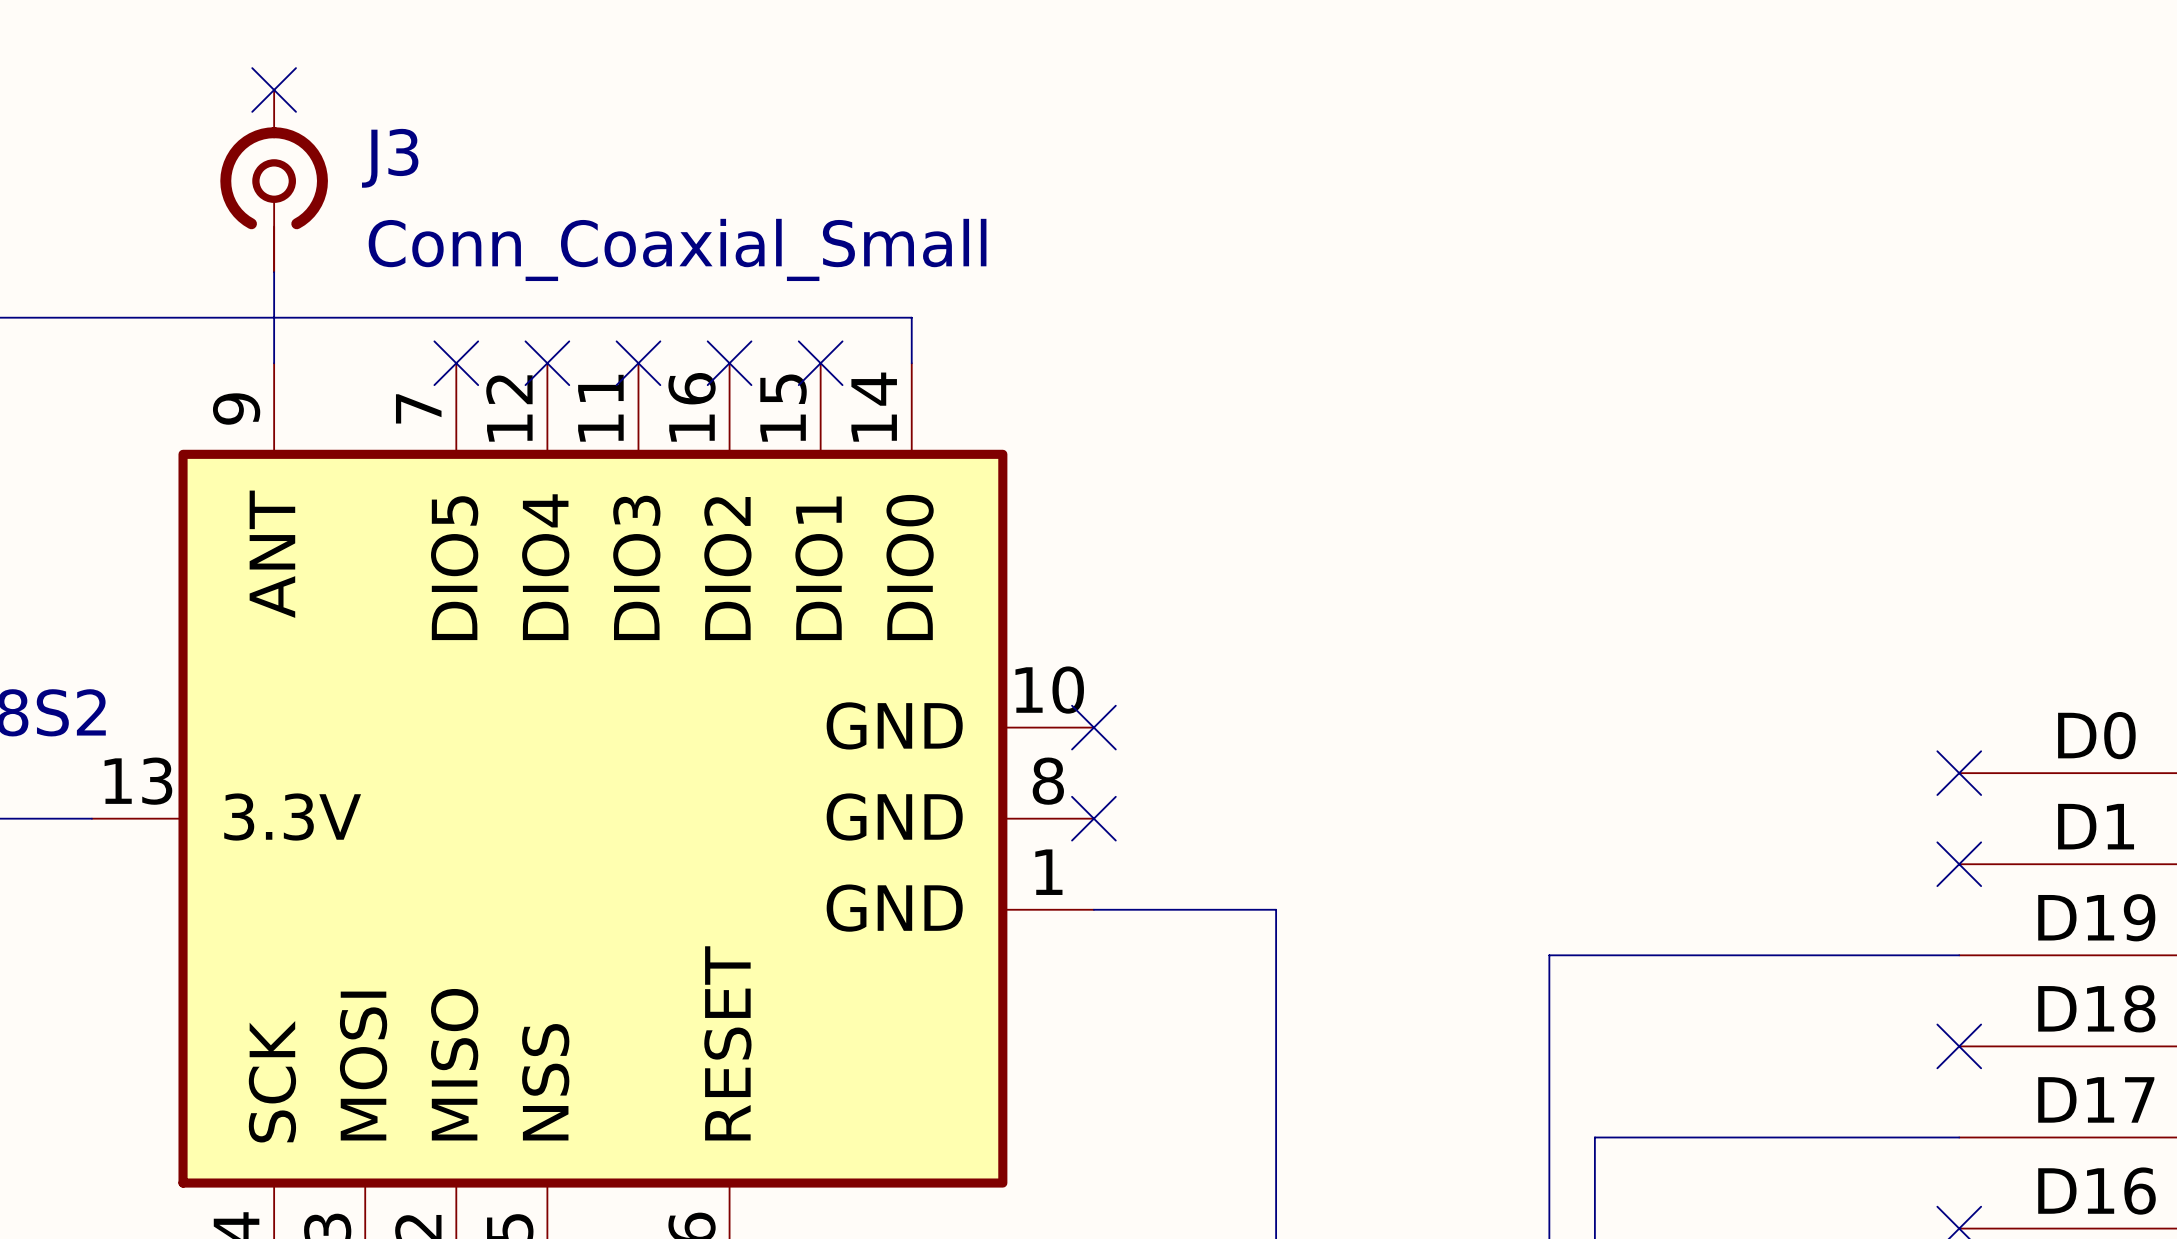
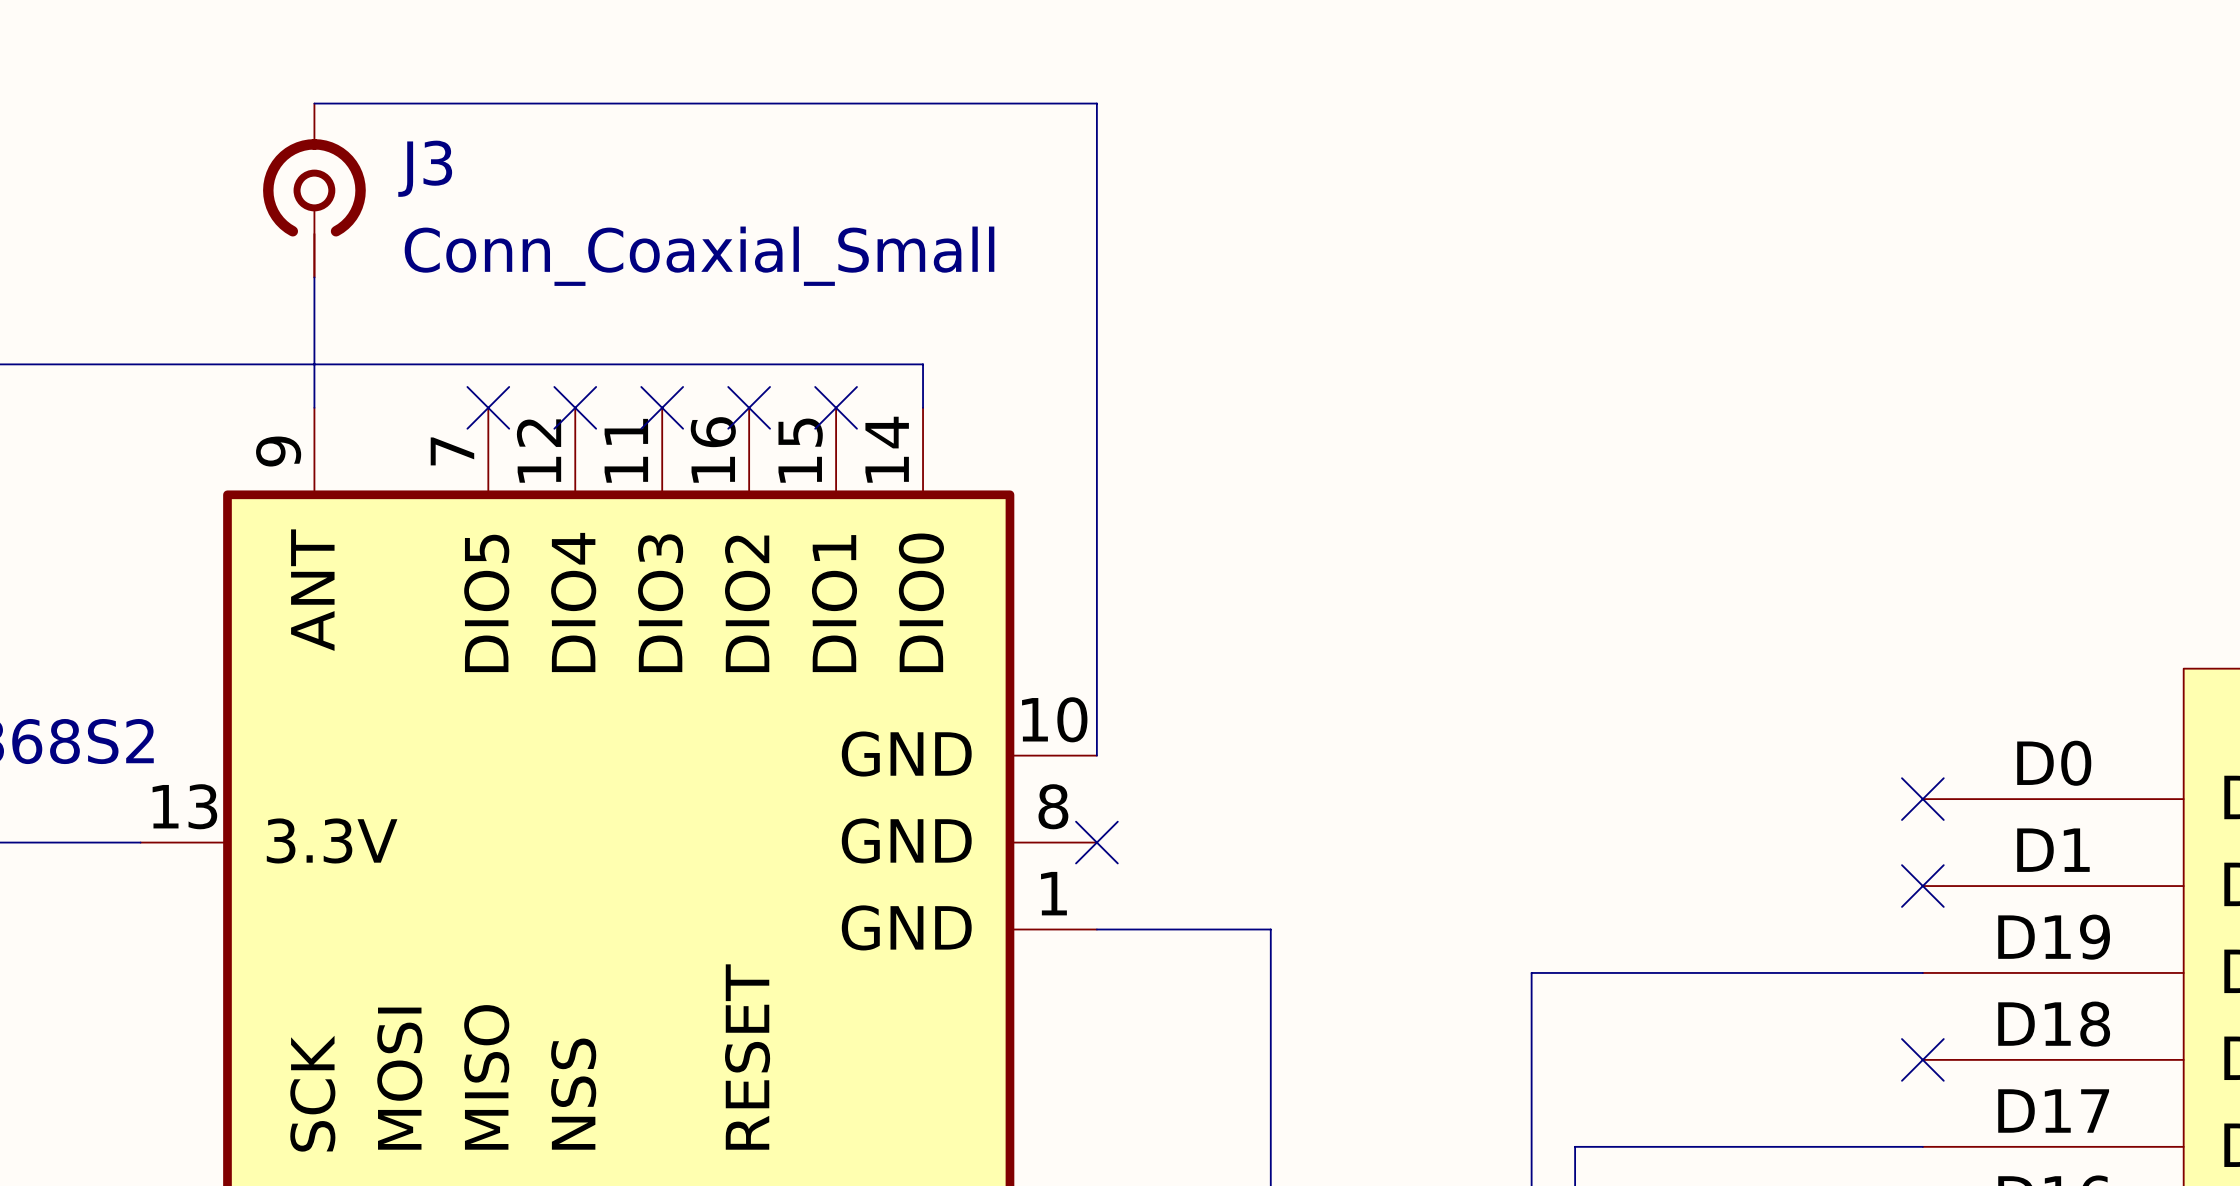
wire: none -> (314, 103) (1096, 103) (1096, 755)
no-connect mark: (274, 89) -> none
J3 position: (274, 181) -> (314, 190)
no-connect mark: (1093, 727) -> none

